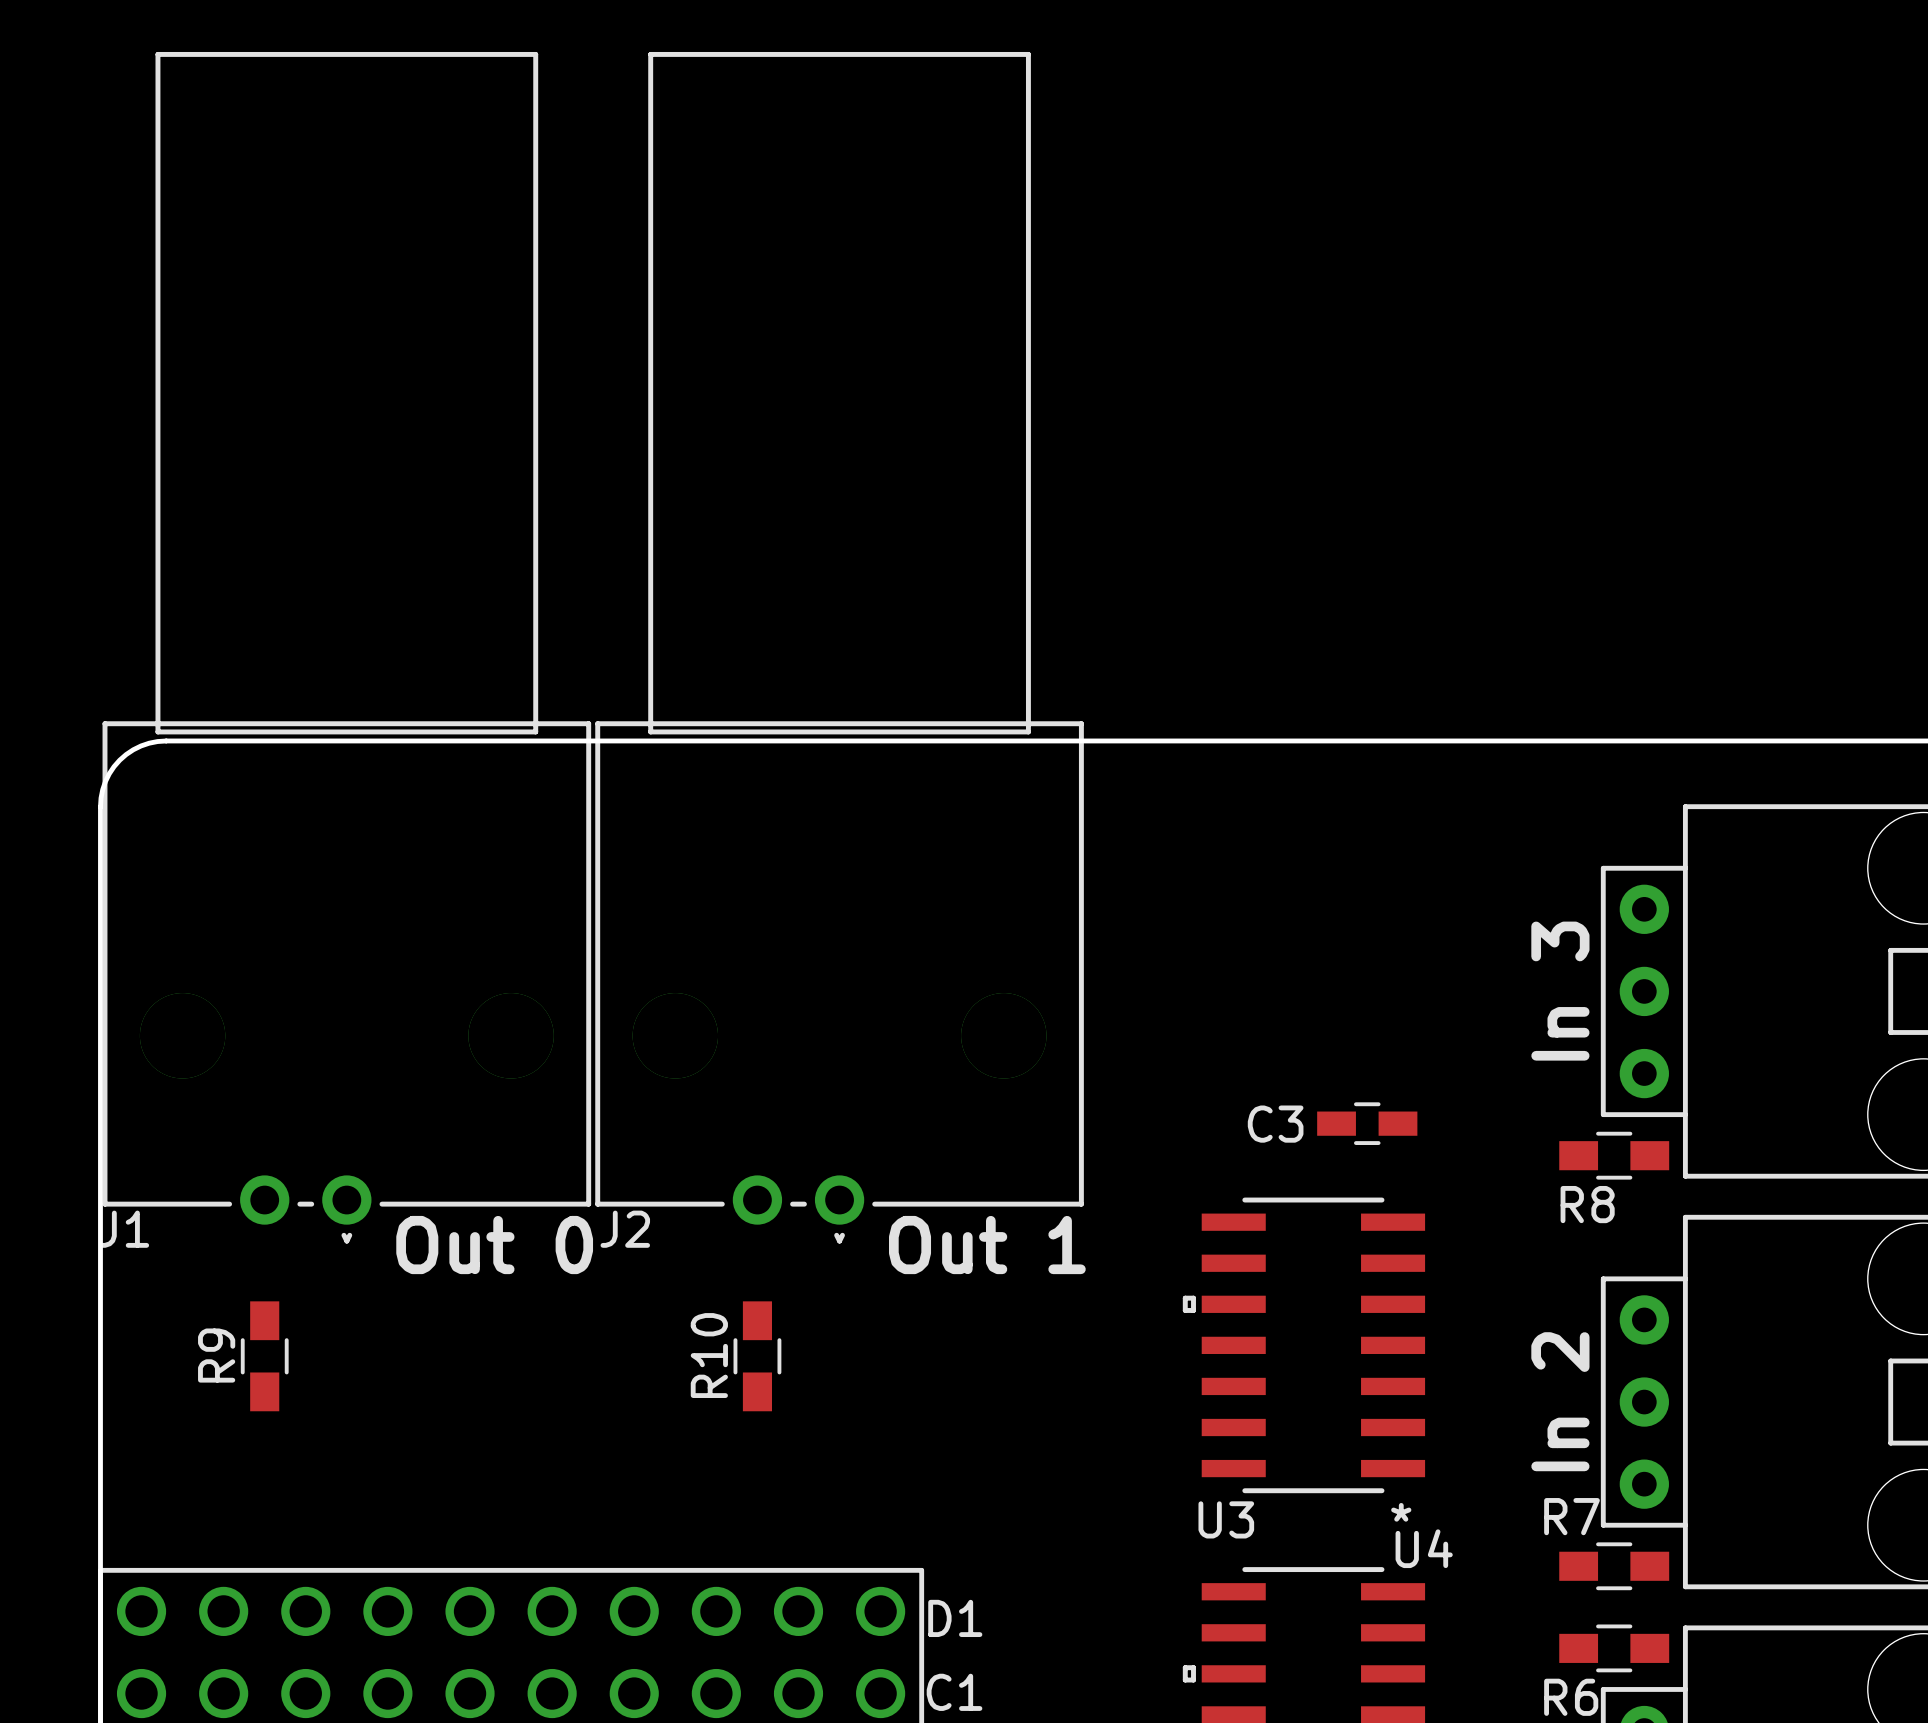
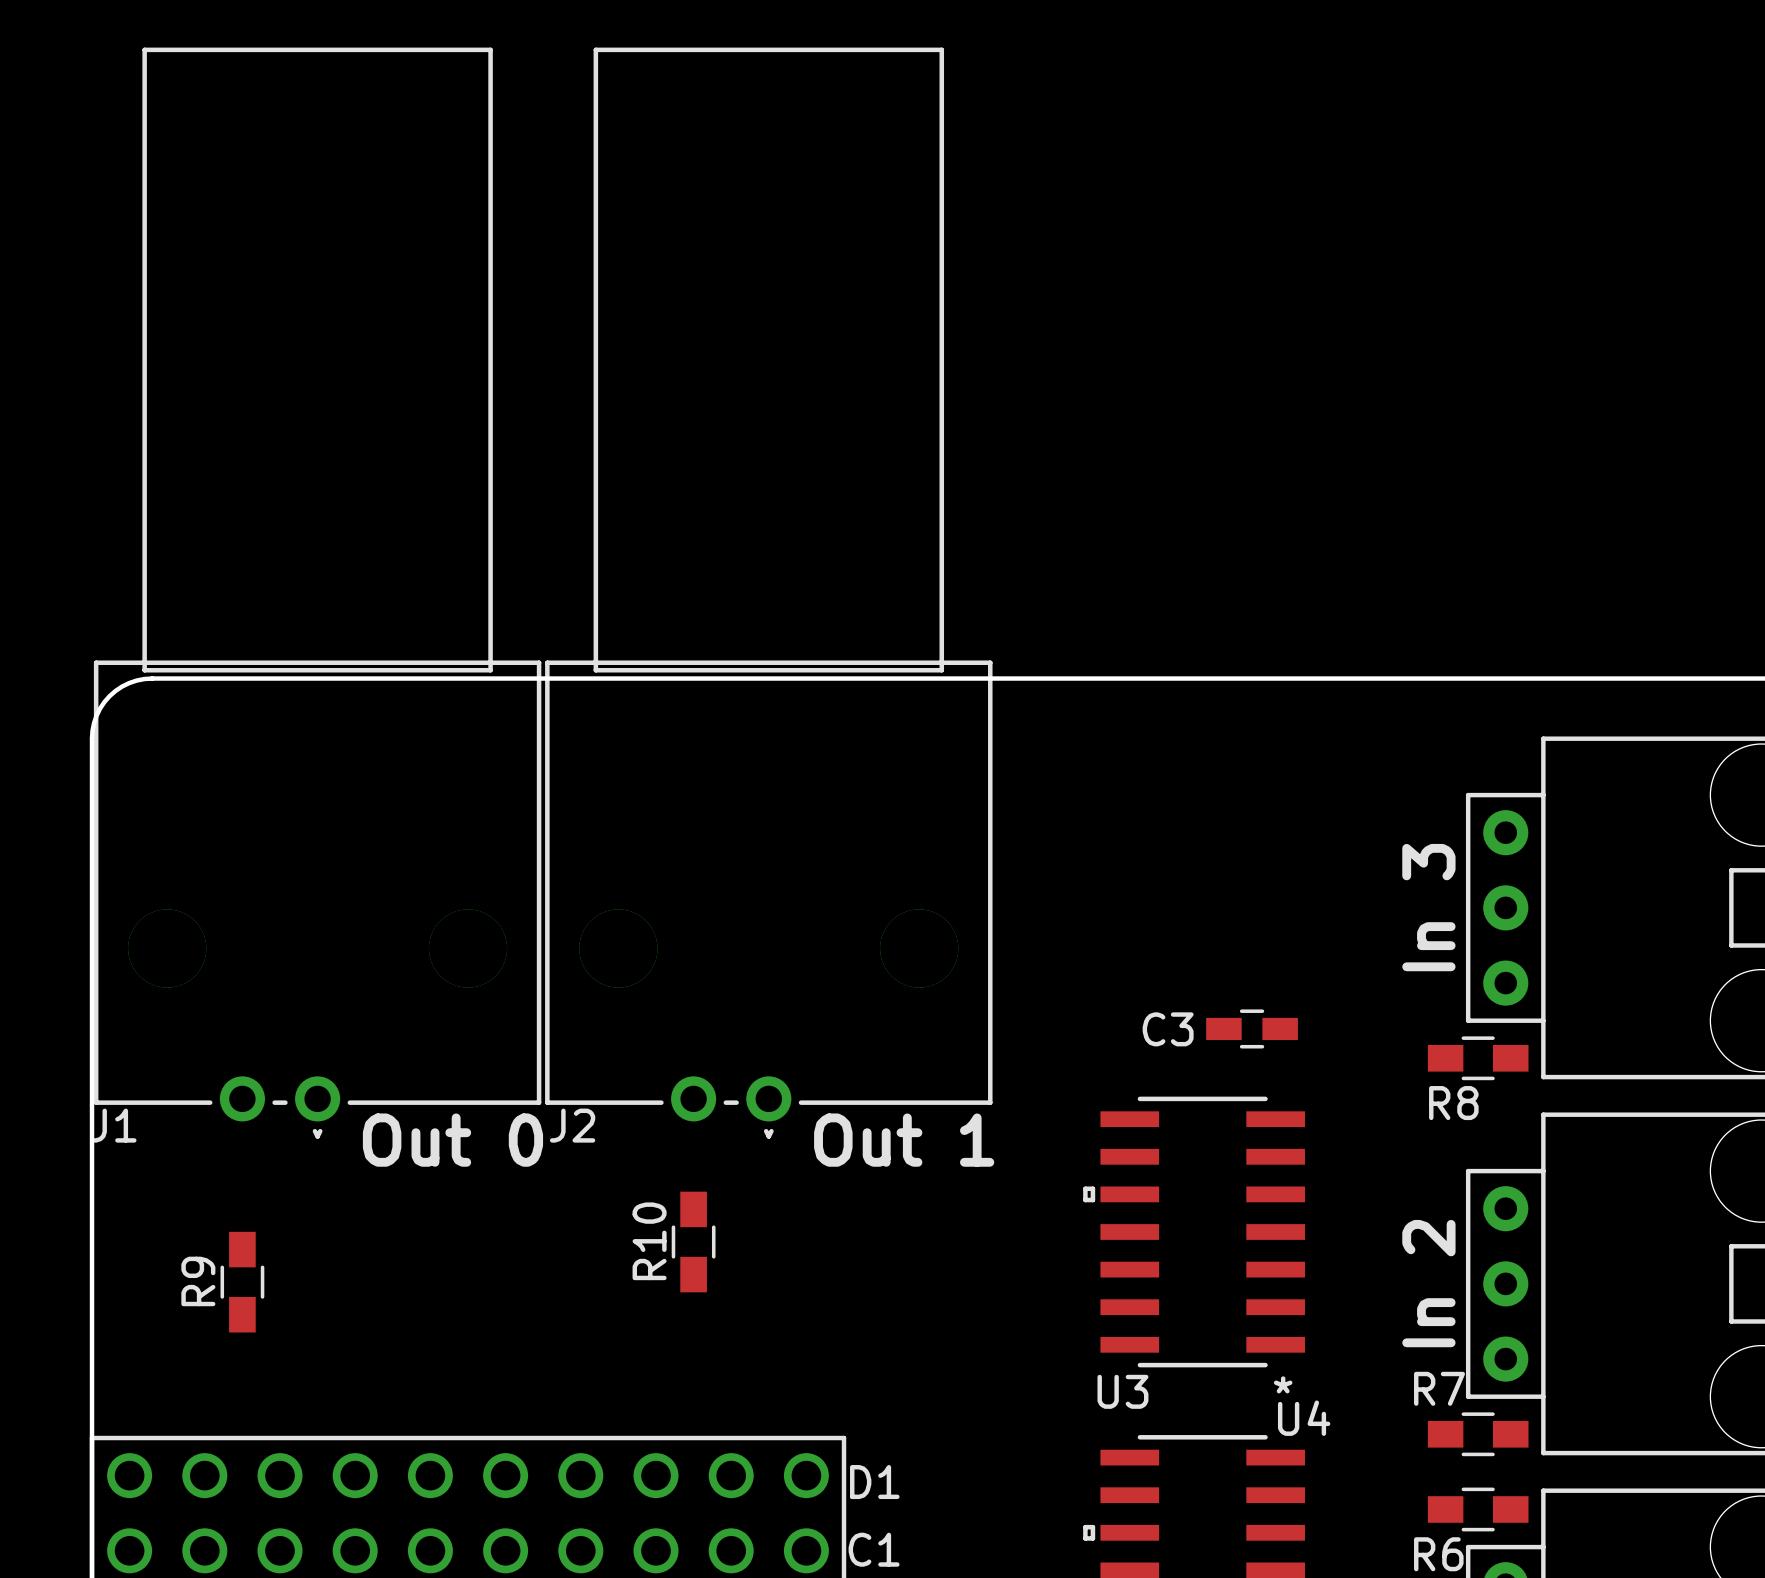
R9 position: (264, 1356) -> (242, 1282)

